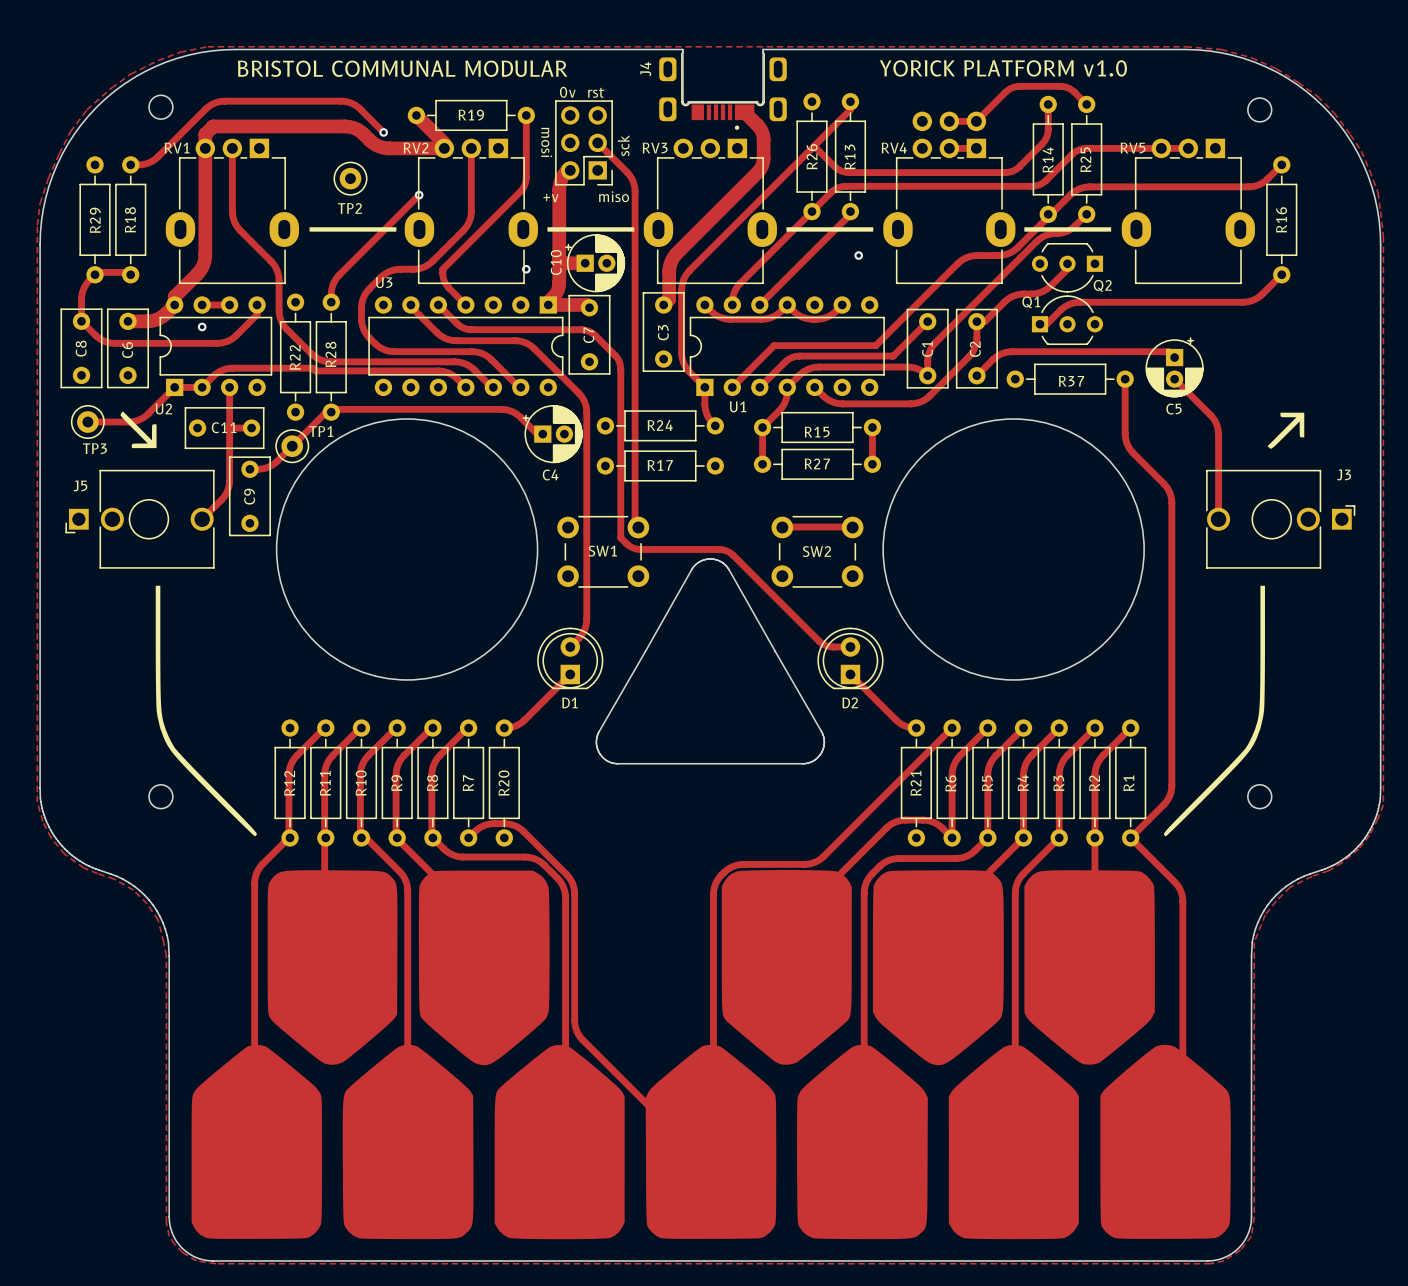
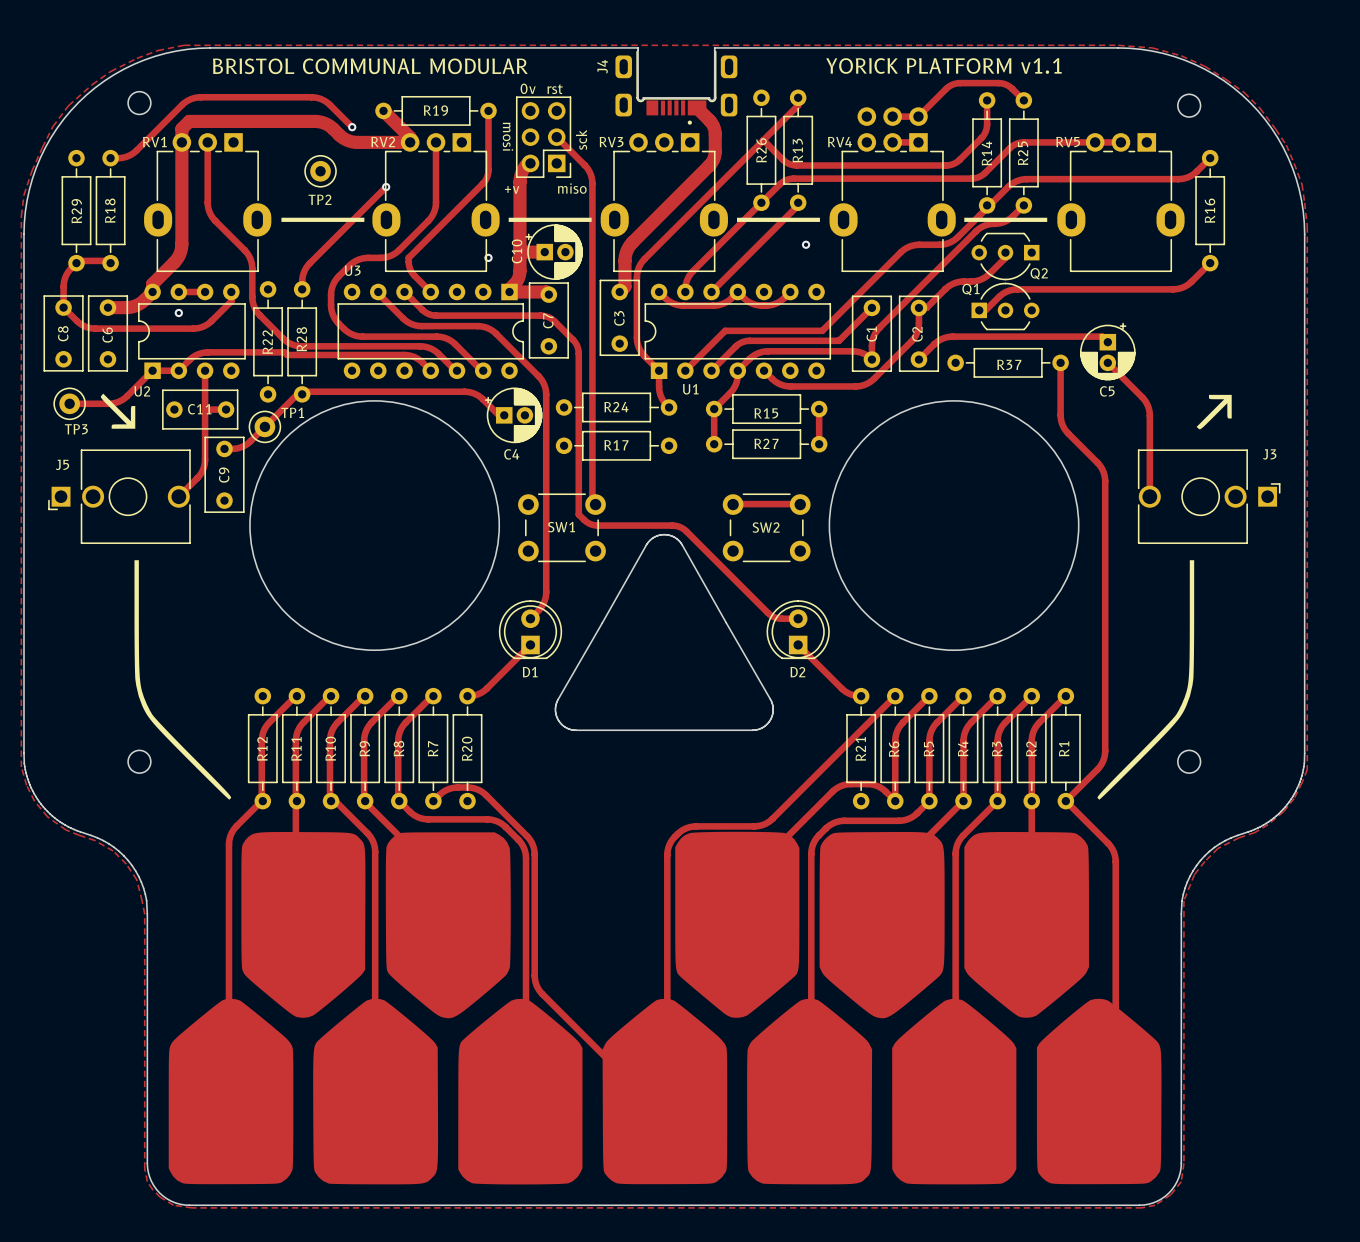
text: YORICK PLATFORM v1.0 (1003, 68) -> YORICK PLATFORM v1.1 (943, 66)

